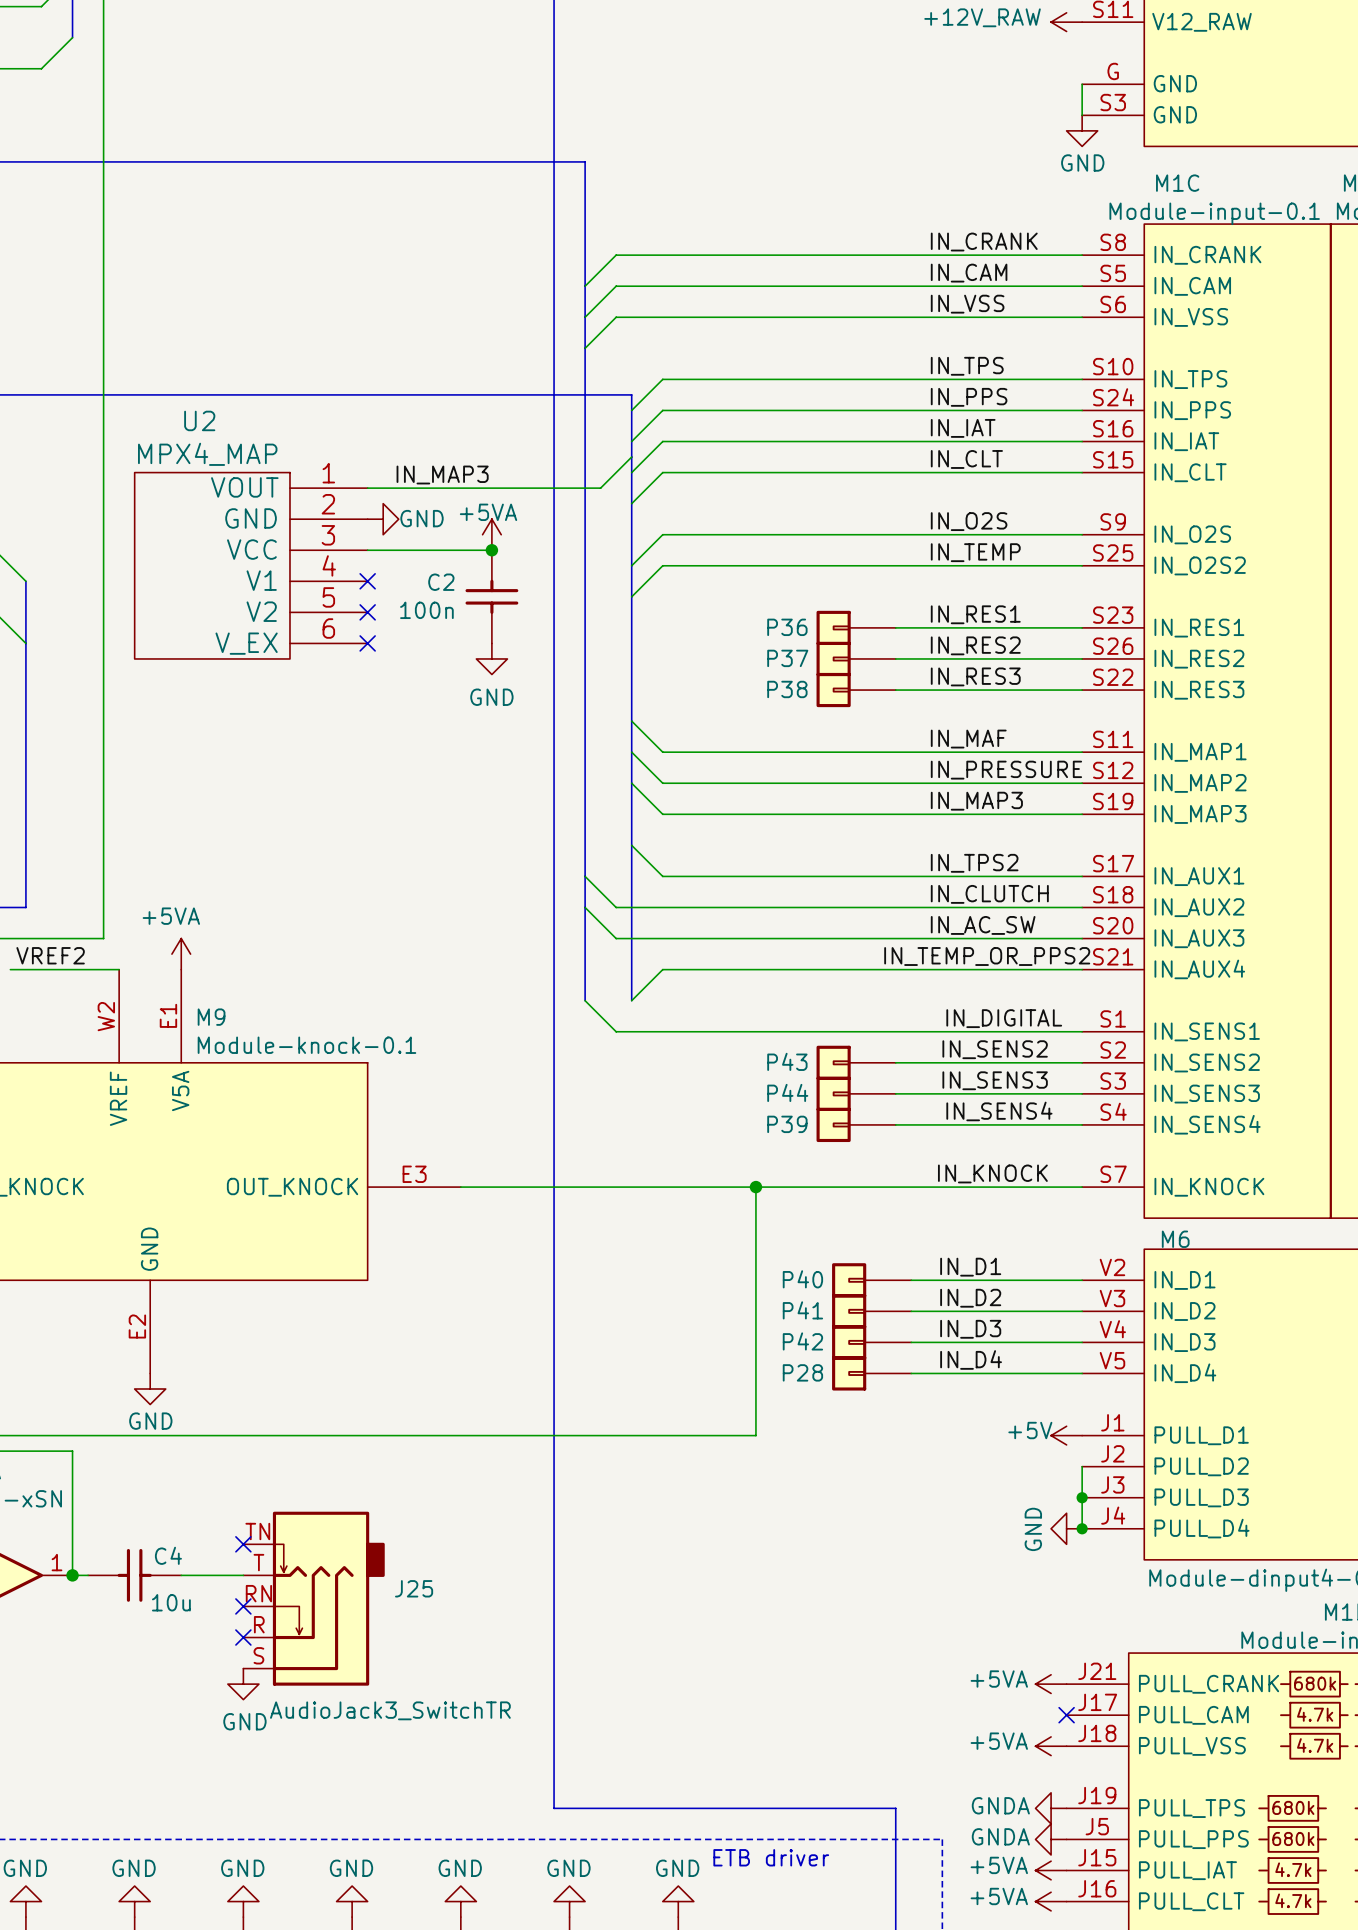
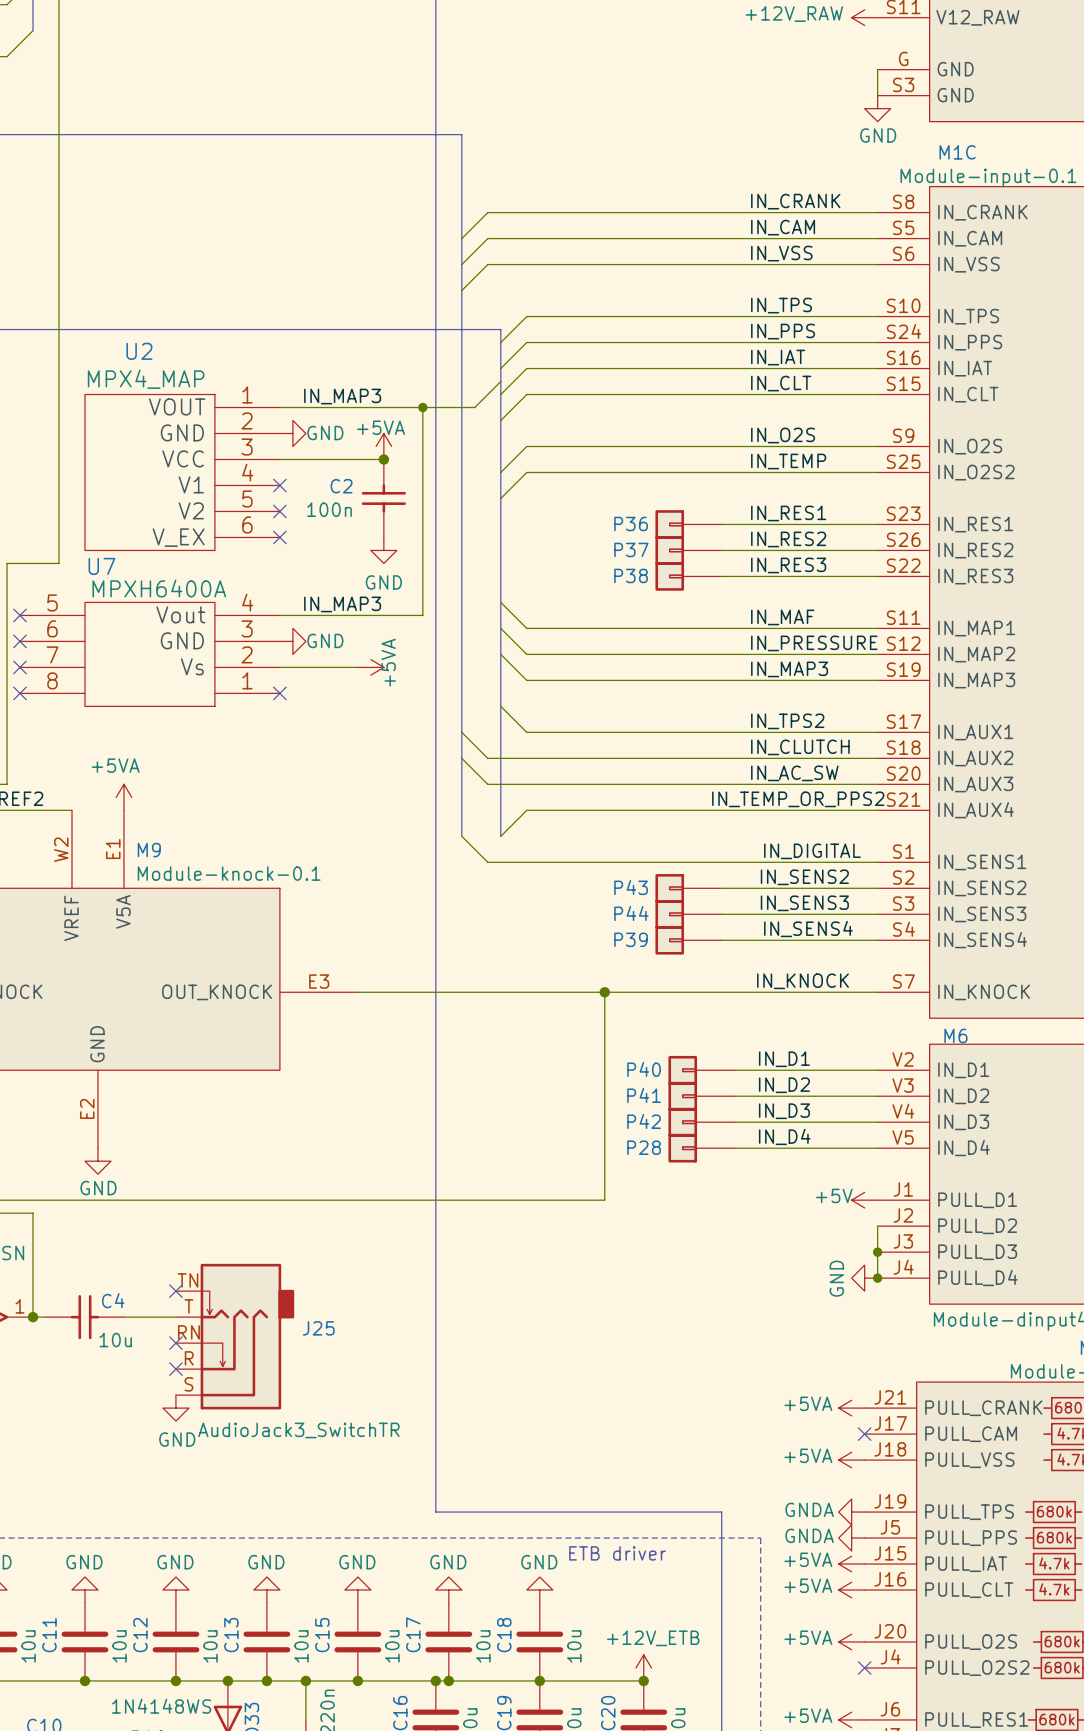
wire: none -> (422, 407) (422, 615) (279, 615)
junction: none -> (422, 407)
wire: (103, 674) (103, 938) (41, 938) -> (58, 563) (7, 563) (7, 784)
label: none -> IN_MAP3 (342, 604)
no-connect mark: none -> (20, 615)
no-connect mark: none -> (20, 641)
power symbol: none -> GND (292, 641)
U7: none -> MPXH6400A (149, 654)
no-connect mark: none -> (20, 667)
wire: none -> (279, 667) (357, 667)
power symbol: none -> +5VA (370, 667)
no-connect mark: none -> (20, 693)
no-connect mark: none -> (279, 693)

